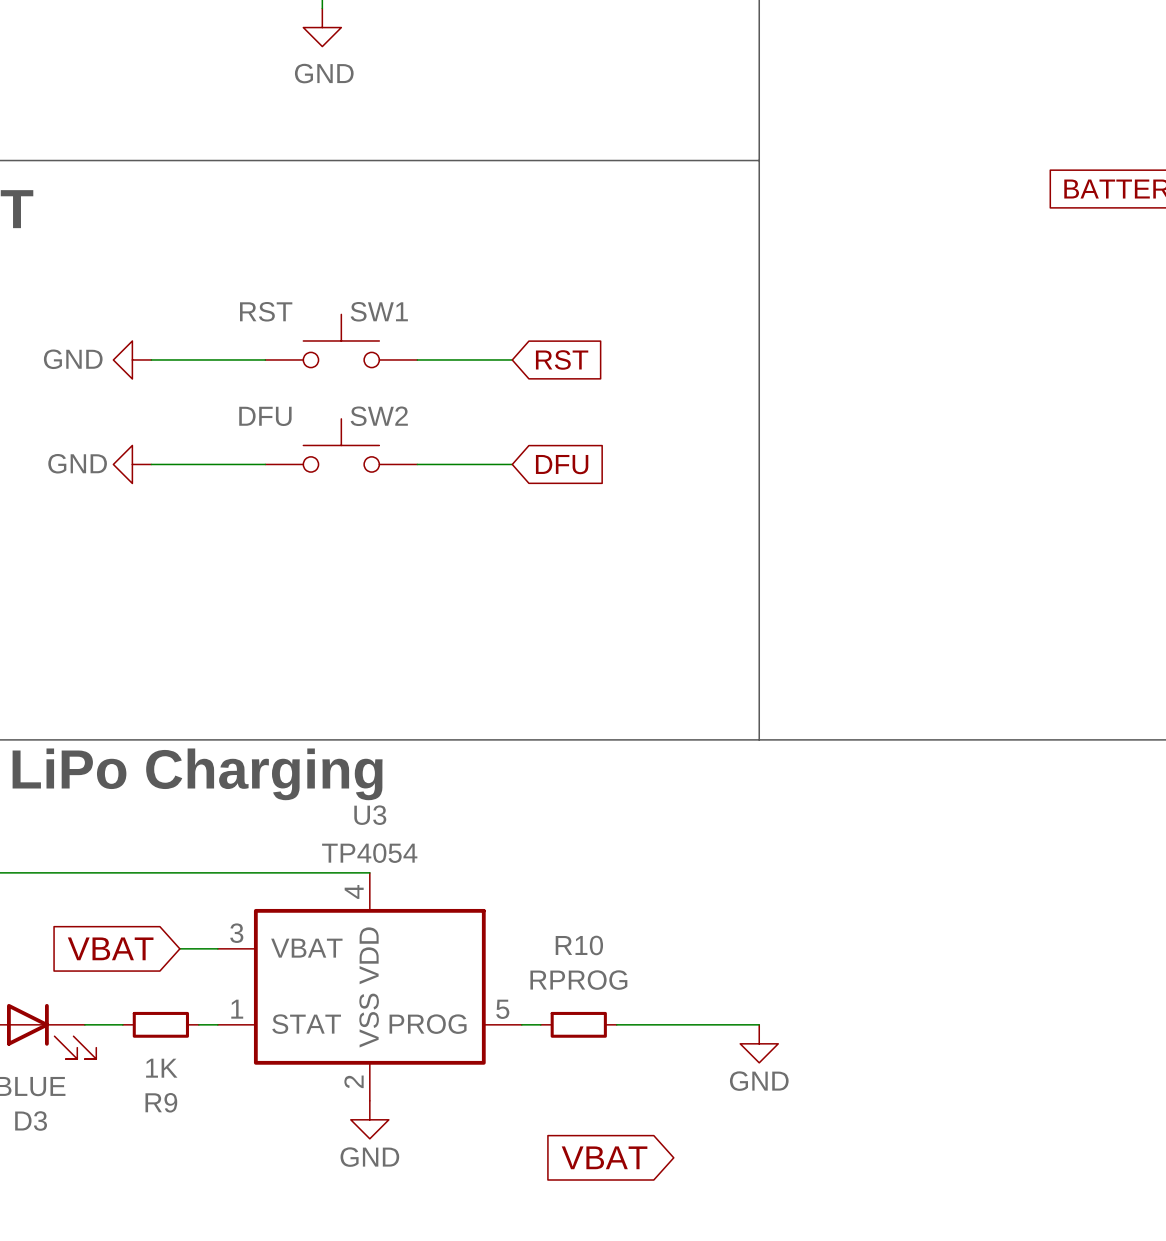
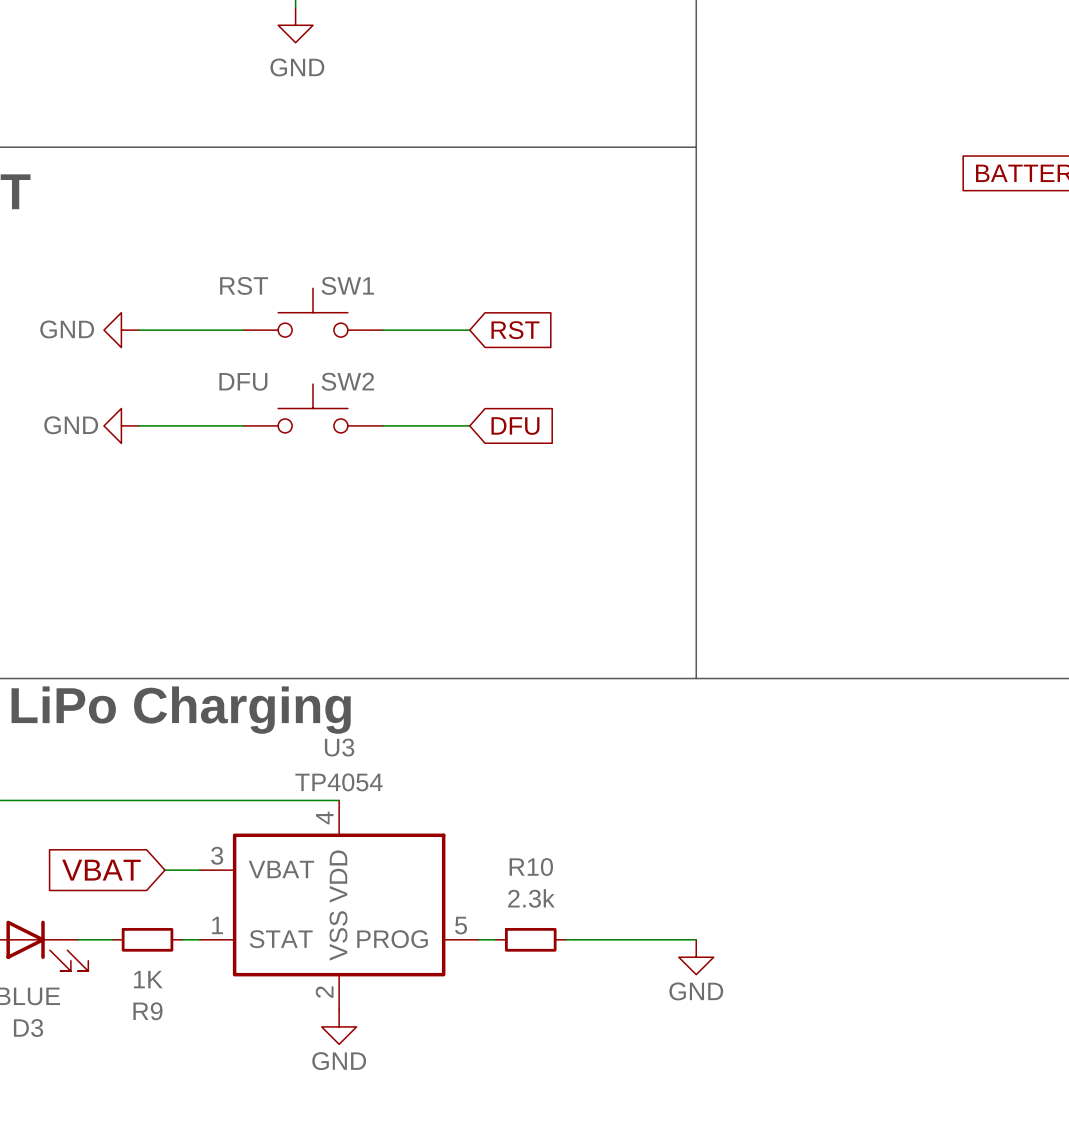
R10 value: RPROG (578, 980) -> 2.3k (531, 898)
global label: VBAT (604, 1157) -> none

